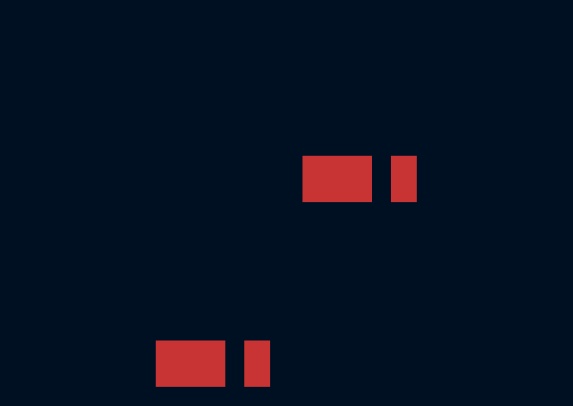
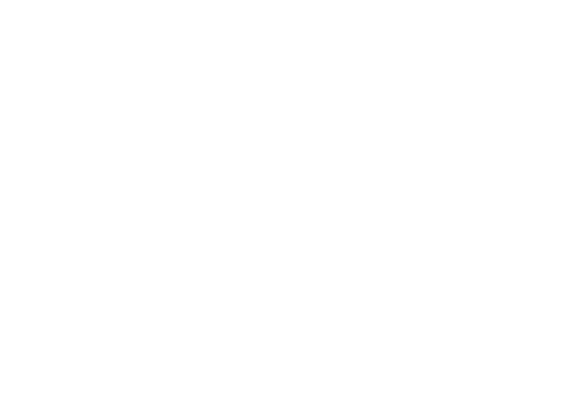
part: (359, 178) -> none
part: (212, 363) -> none

